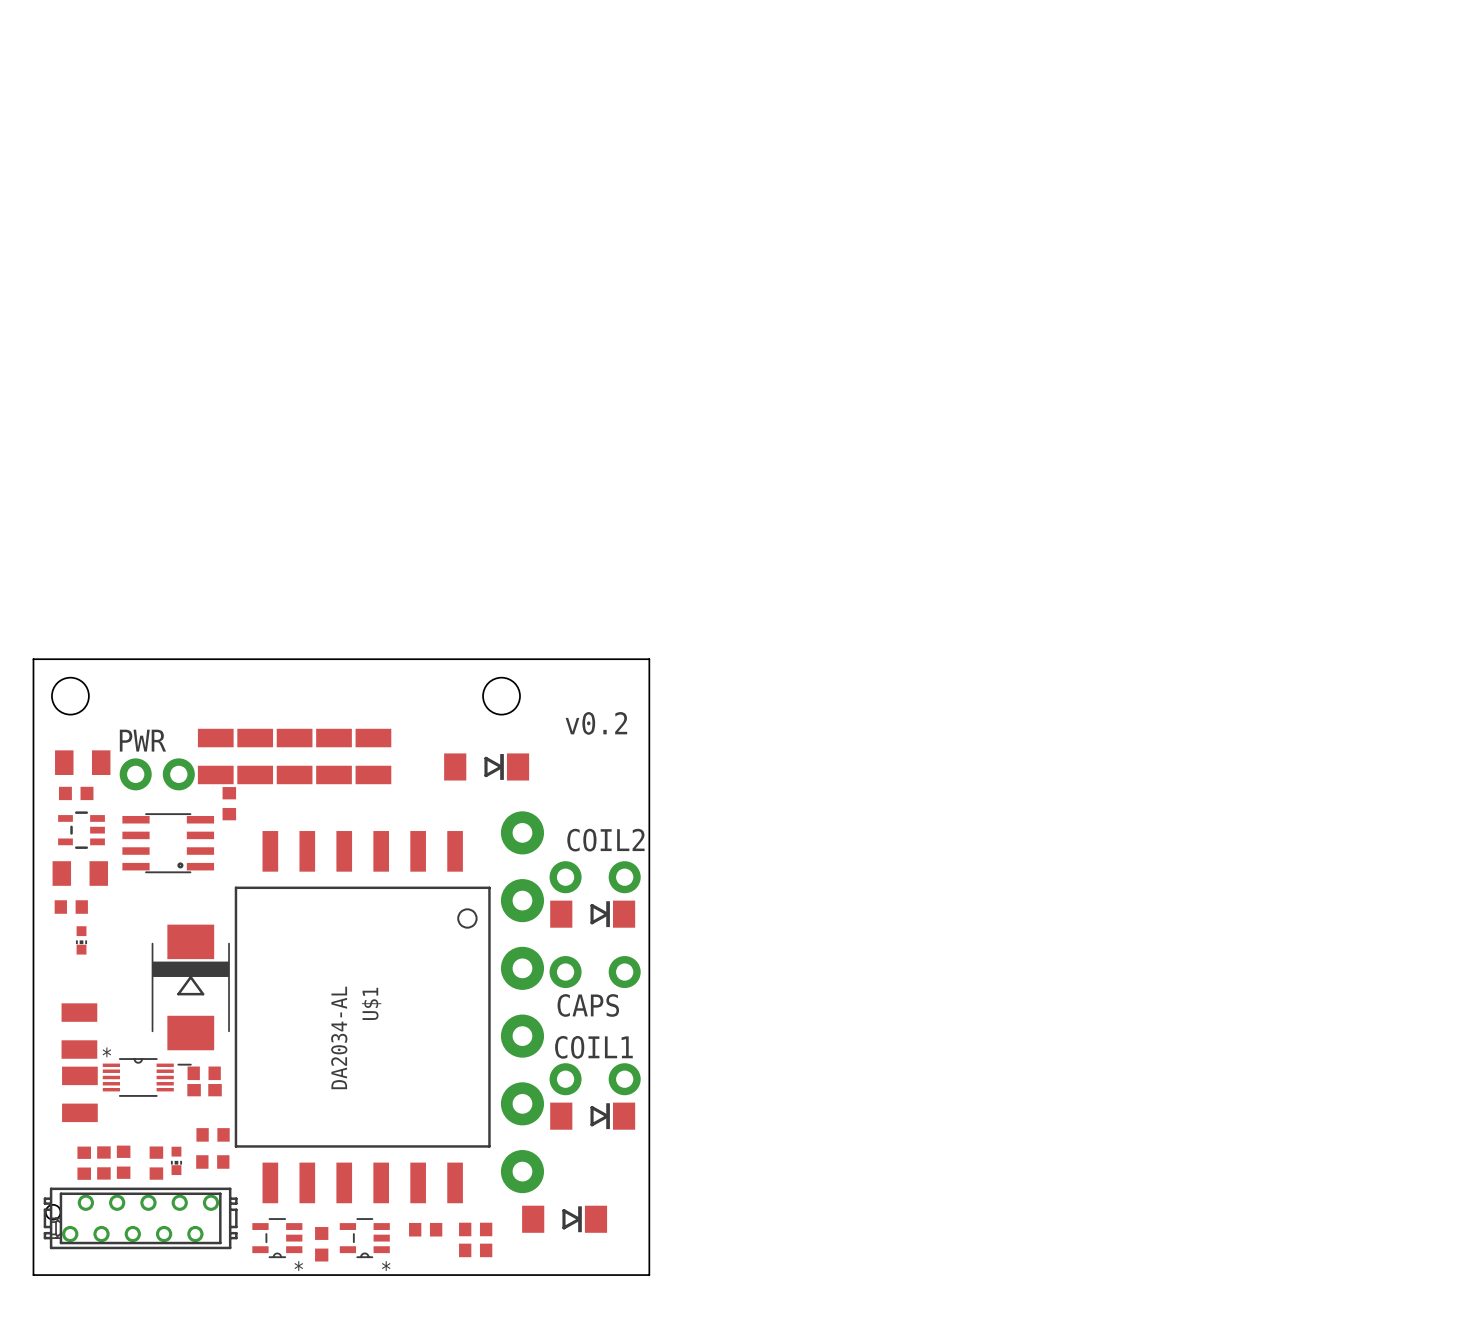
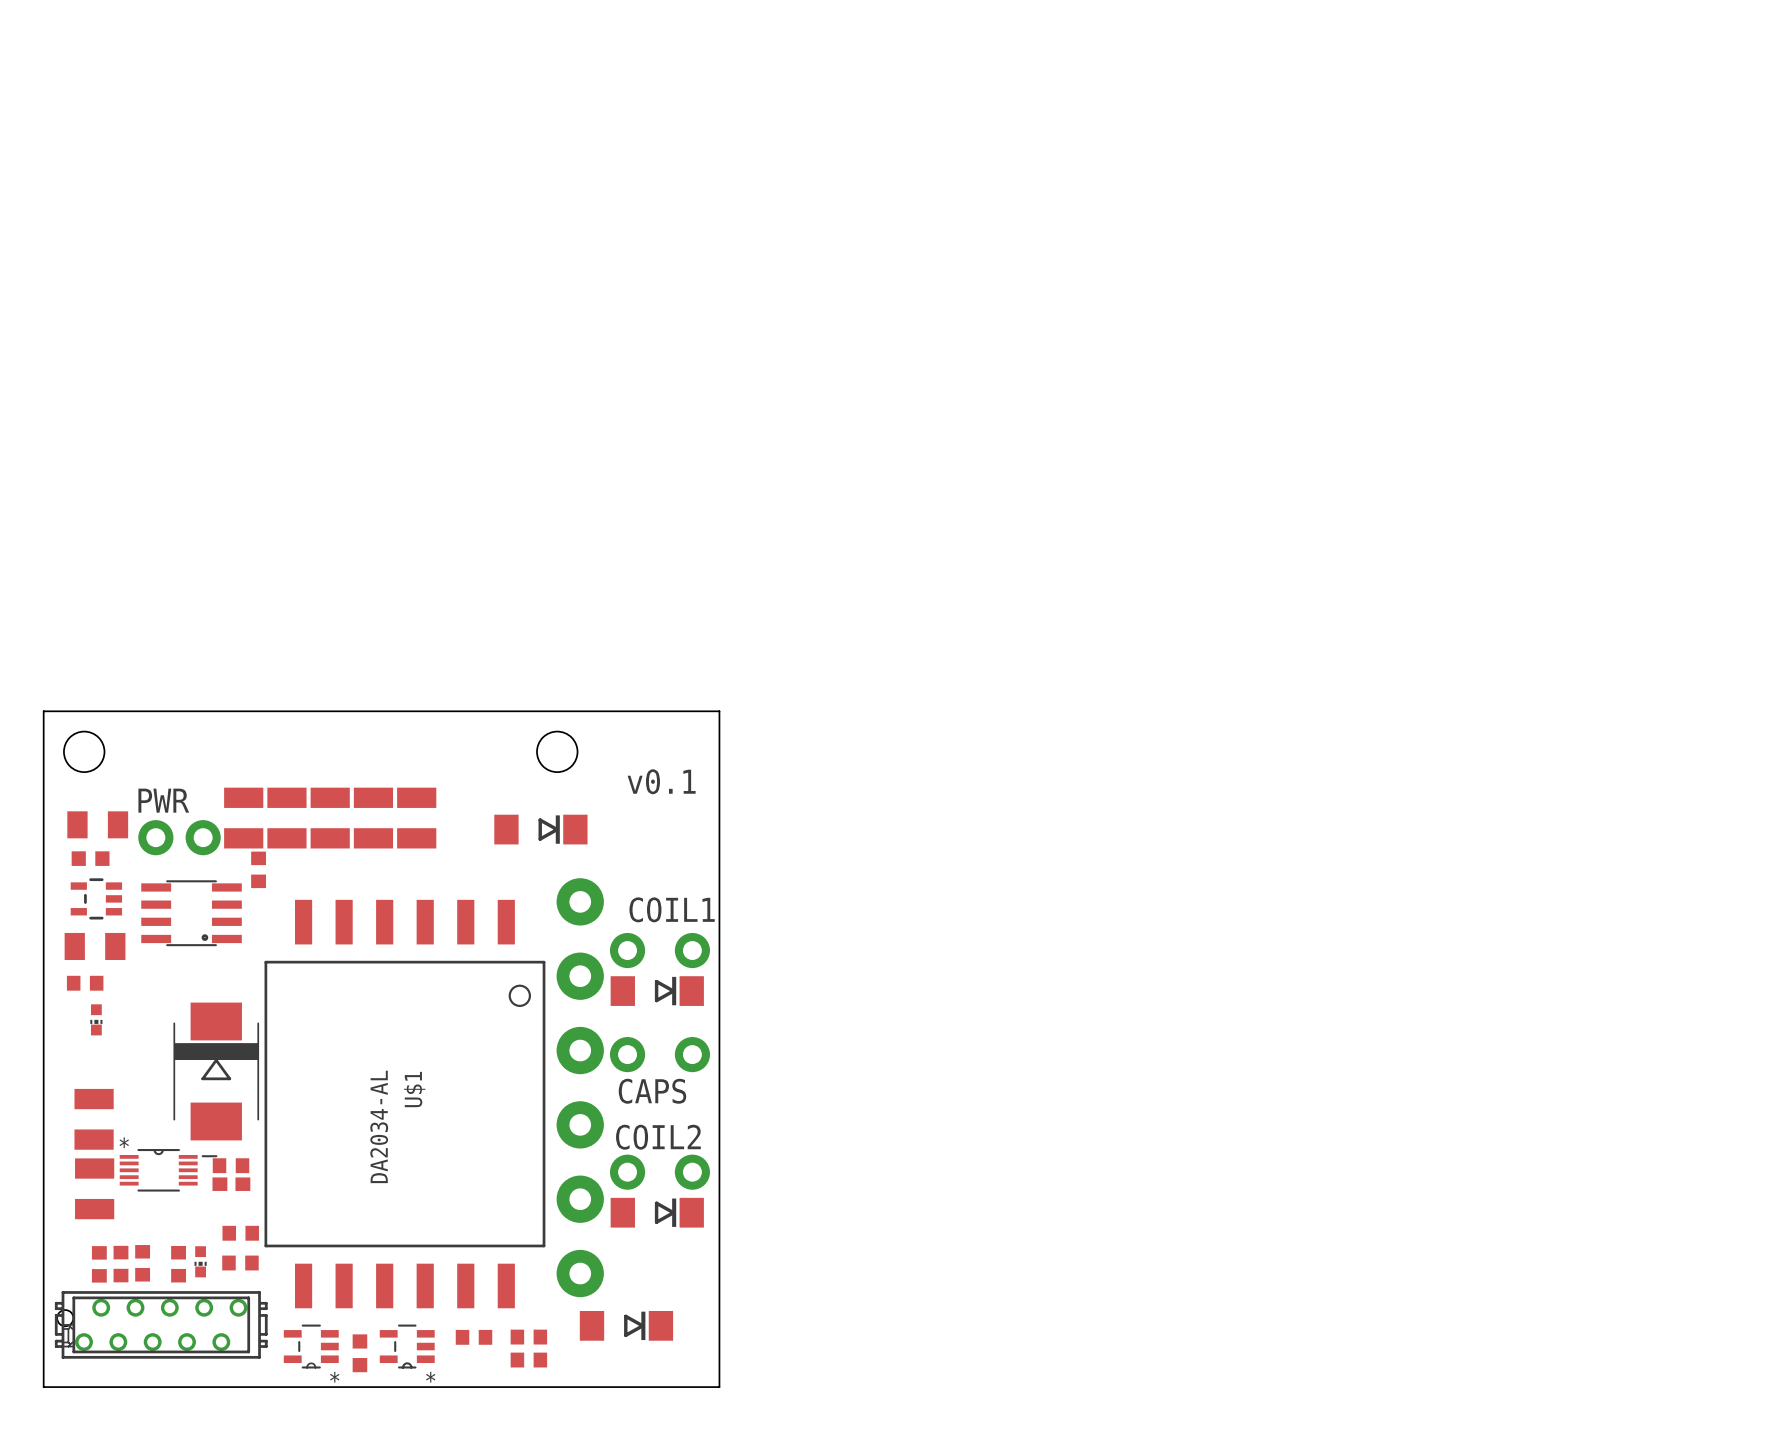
text: v0.2 (596, 723) -> v0.1 (661, 781)
text: COIL2 (605, 840) -> COIL1 (672, 909)
text: COIL1 (593, 1047) -> COIL2 (658, 1137)

